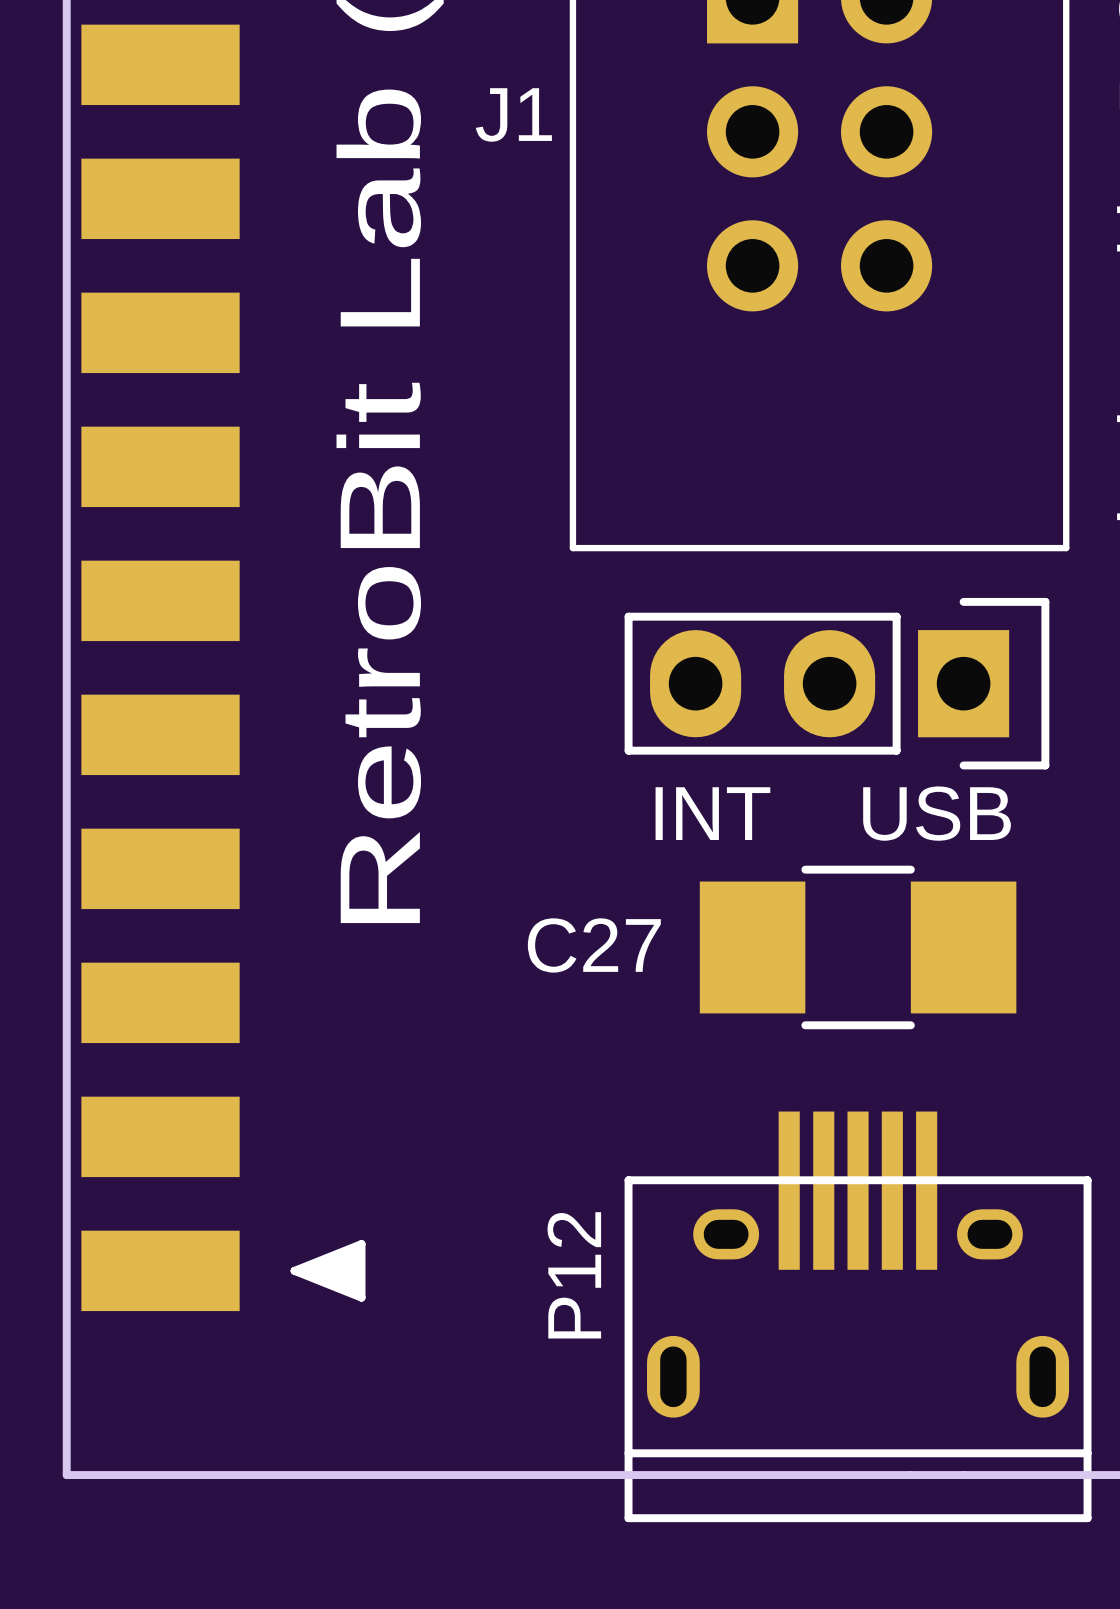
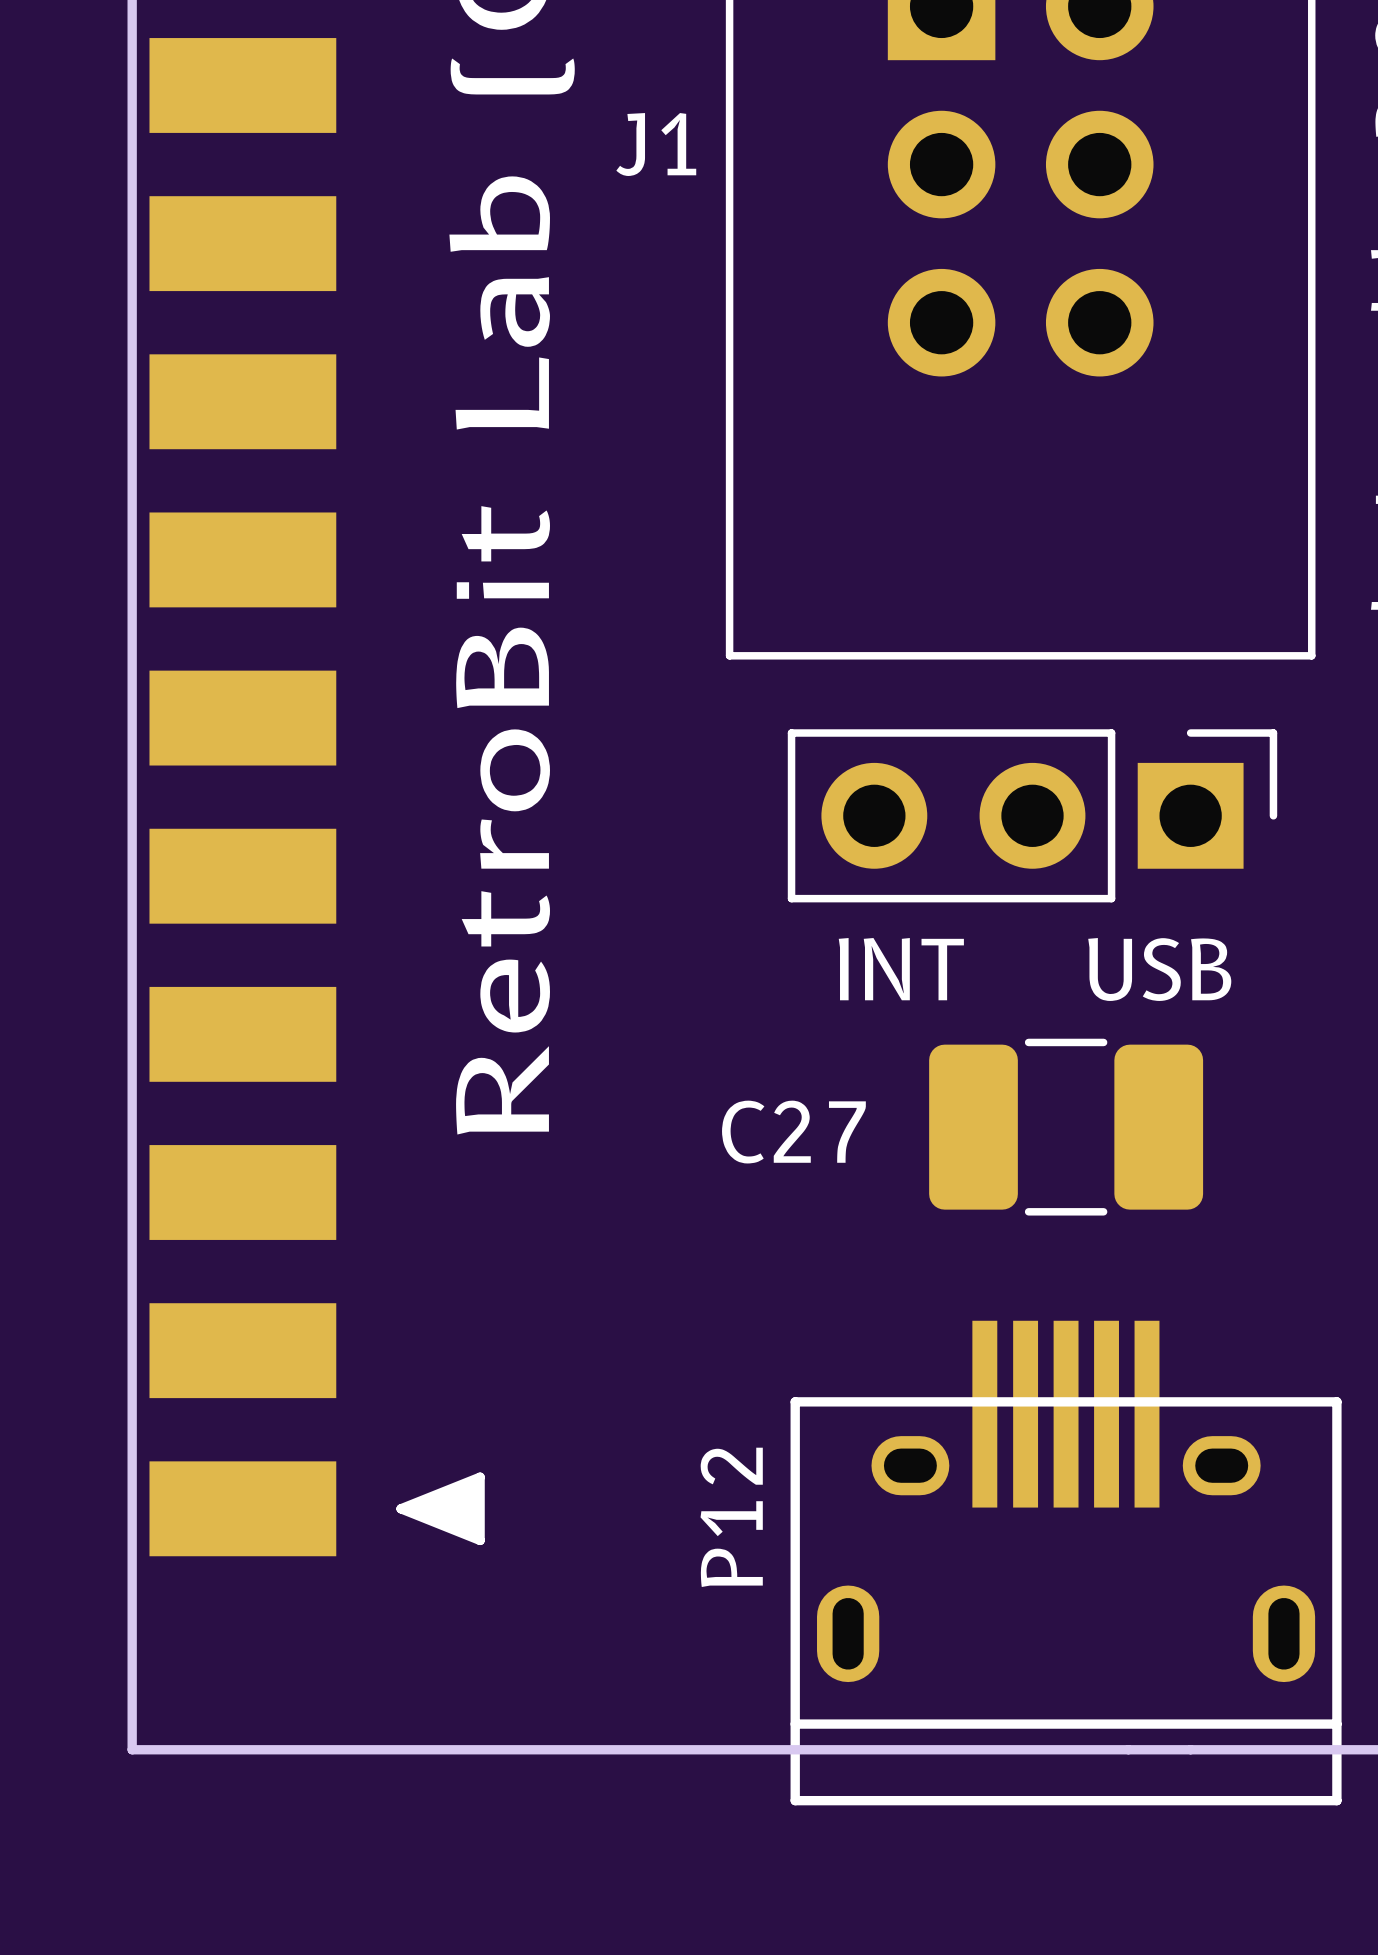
part footprint: [624, 597, 1050, 770] -> [787, 729, 1278, 903]
C27 footprint: [699, 865, 1017, 1030] -> [929, 1038, 1204, 1216]

